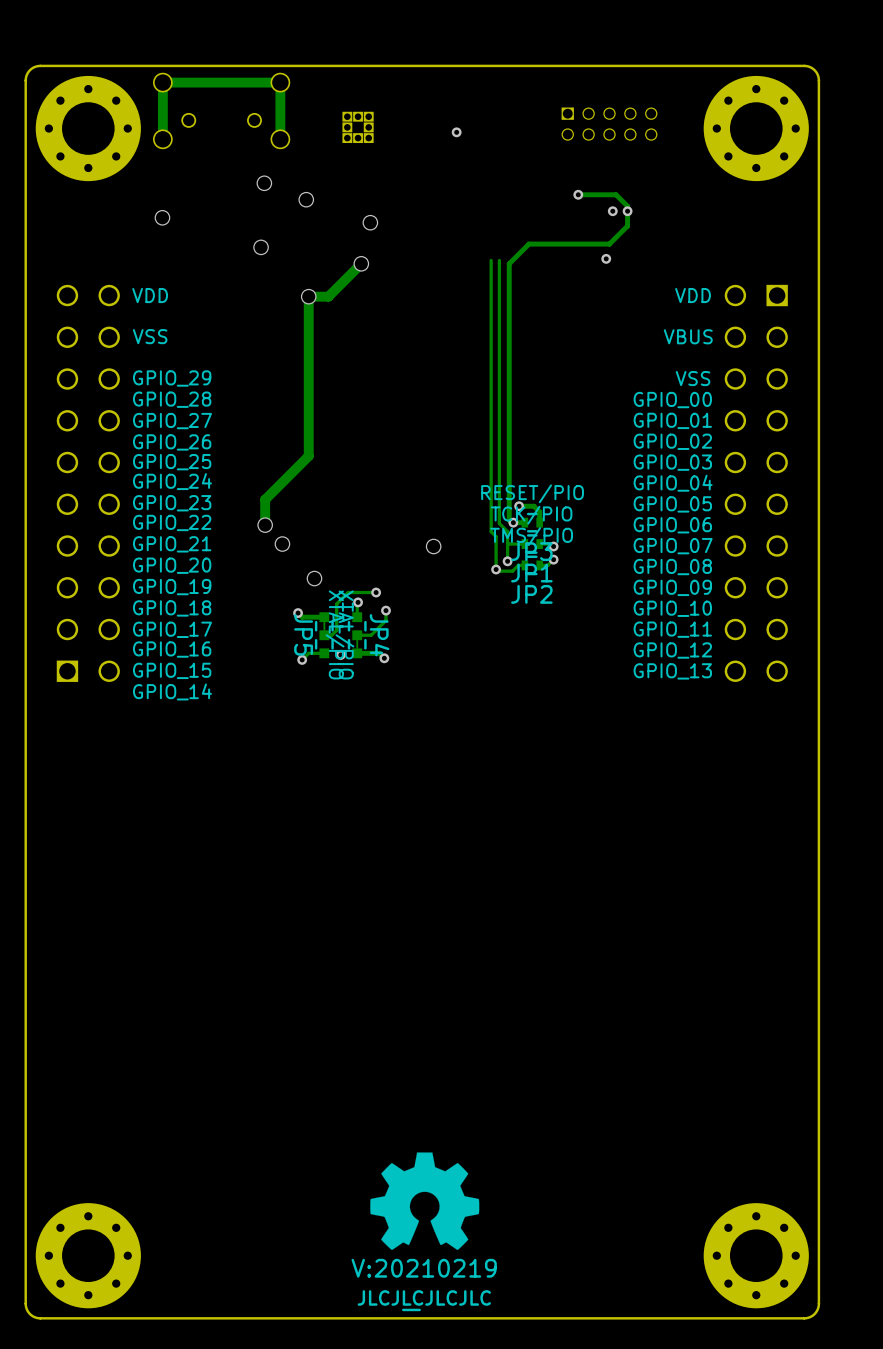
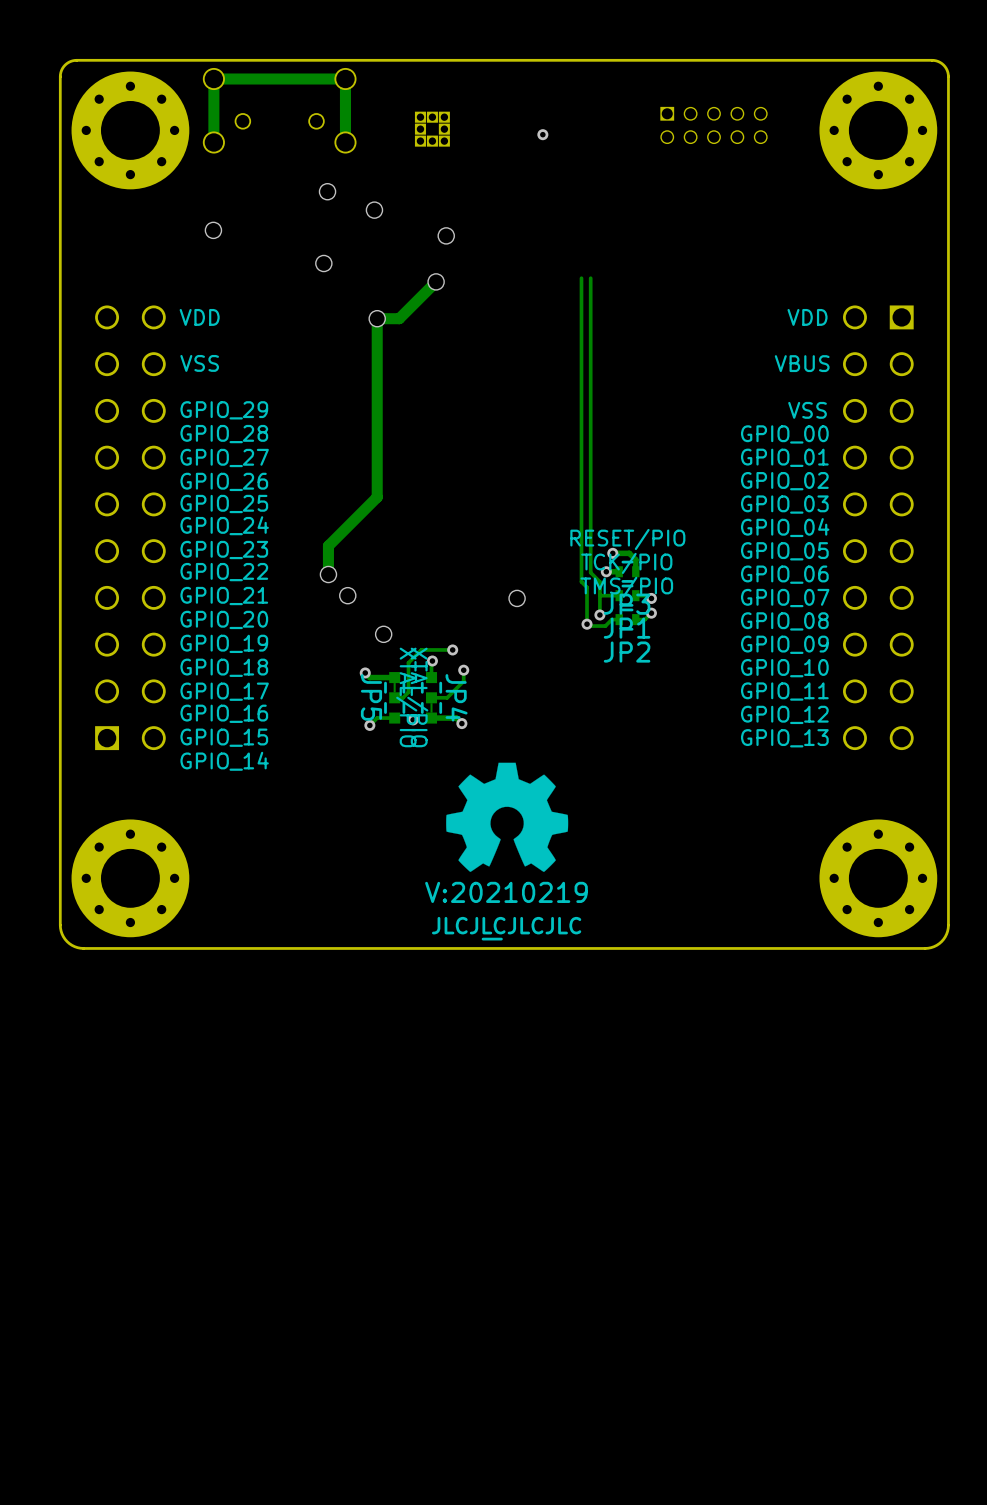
track: (578, 194) (616, 194) (627, 206) (627, 226) (609, 244) (528, 244) (509, 263) (509, 520) (511, 522) -> none
via: (578, 194) -> none
via: (612, 211) -> none
via: (627, 211) -> none
via: (606, 258) -> none
drawing: none -> [446, 762, 569, 941]
part: none -> (130, 878)
part: none -> (878, 878)
board edge: (818, 838) (818, 1303) (816, 1311) (811, 1316) (804, 1318) (40, 1318) (29, 1314) (25, 1303) (25, 838) -> (948, 925) (946, 934) (941, 941) (934, 946) (925, 948) (83, 948) (74, 946) (67, 941) (62, 934) (60, 925)
drawing: [370, 1152, 480, 1312] -> none
part: (88, 1255) -> none
part: (756, 1255) -> none

